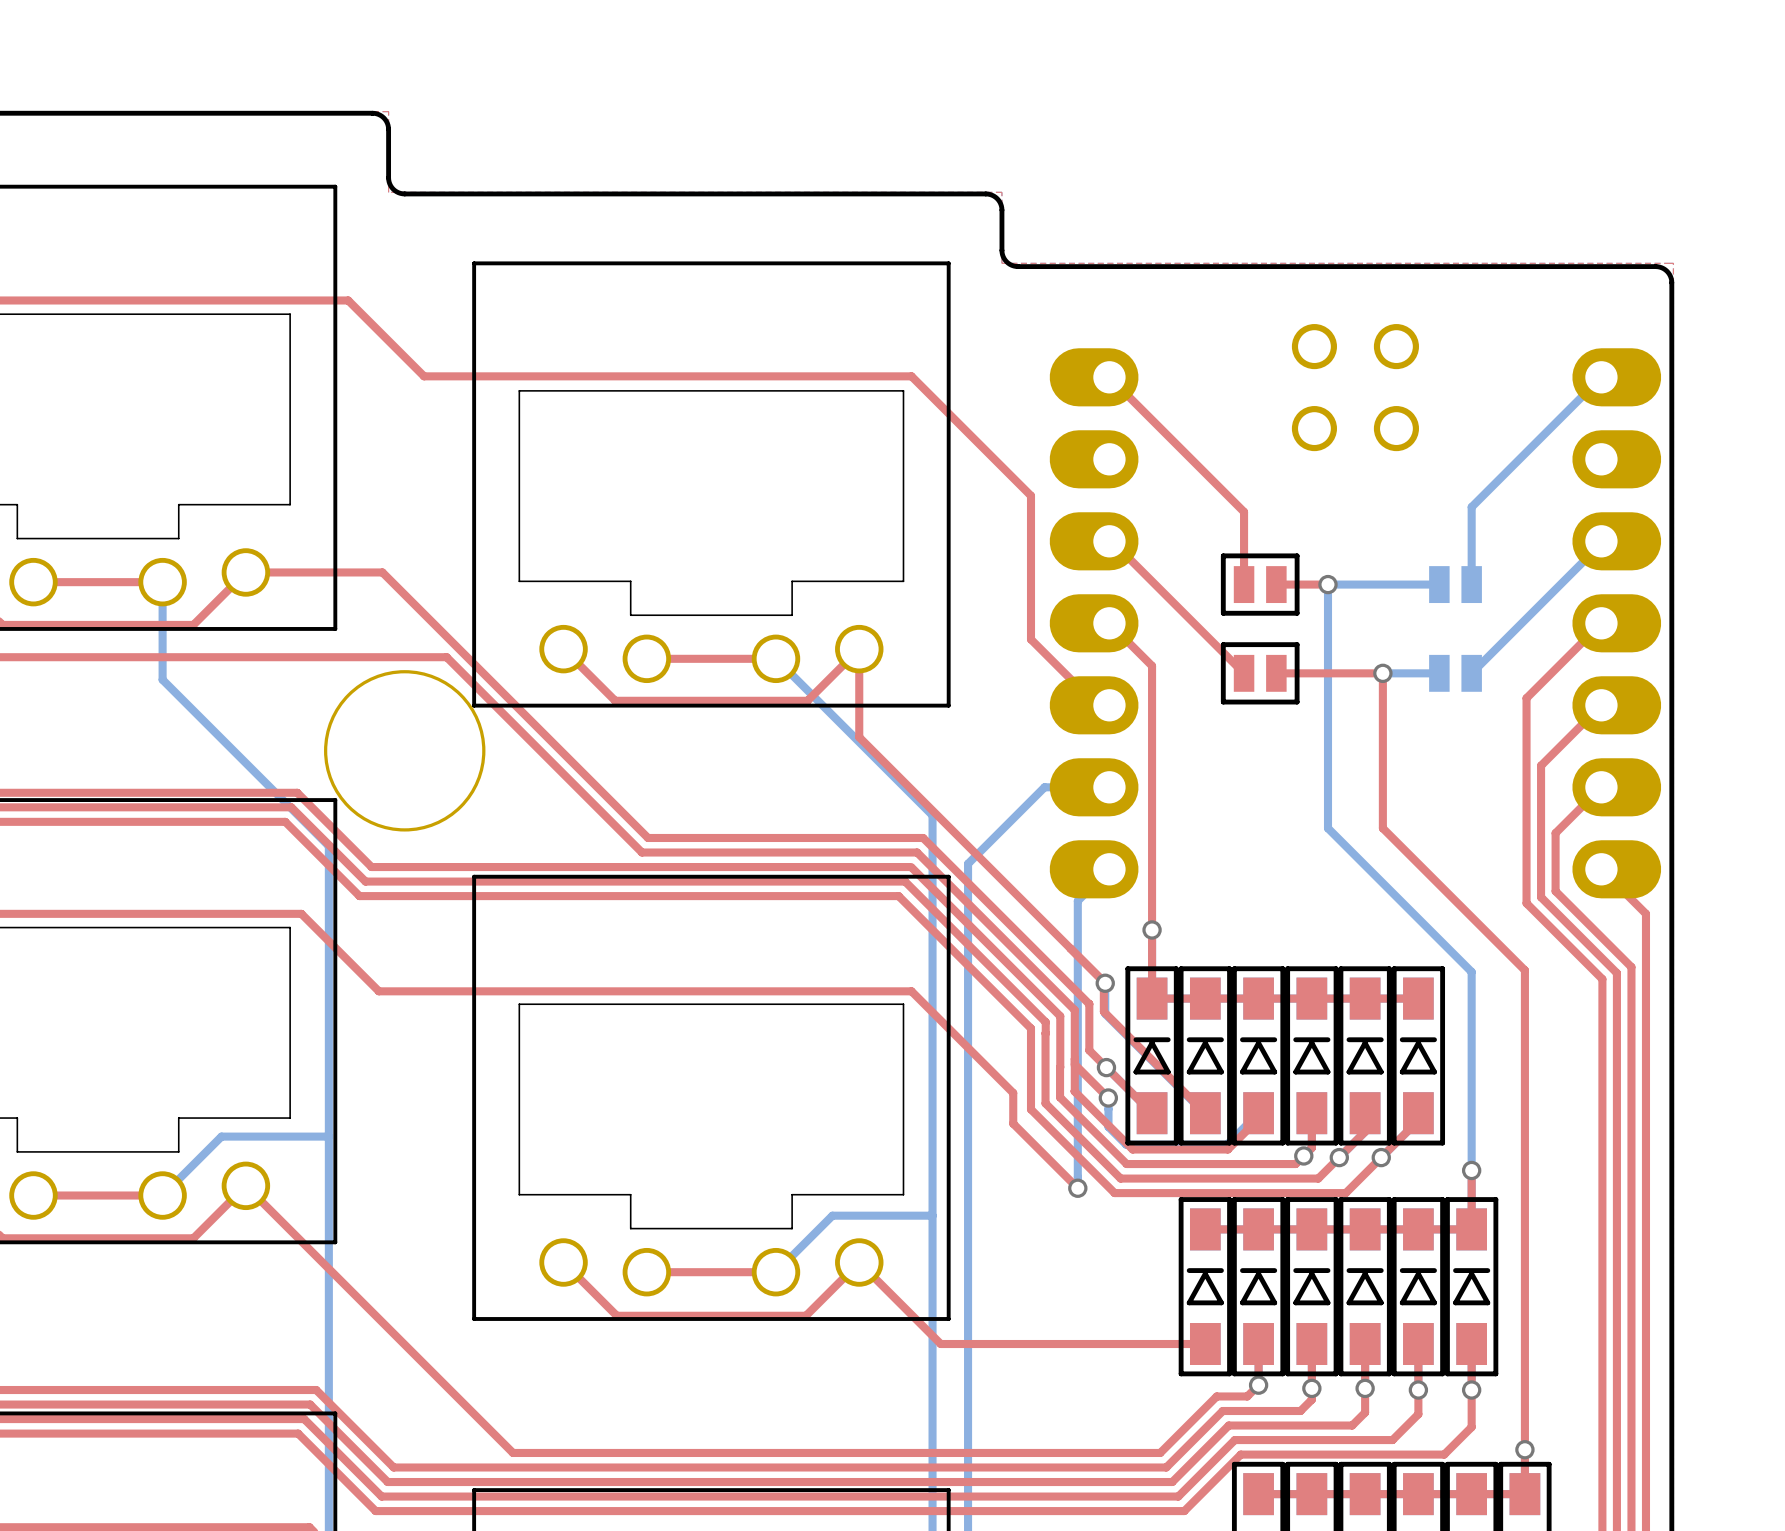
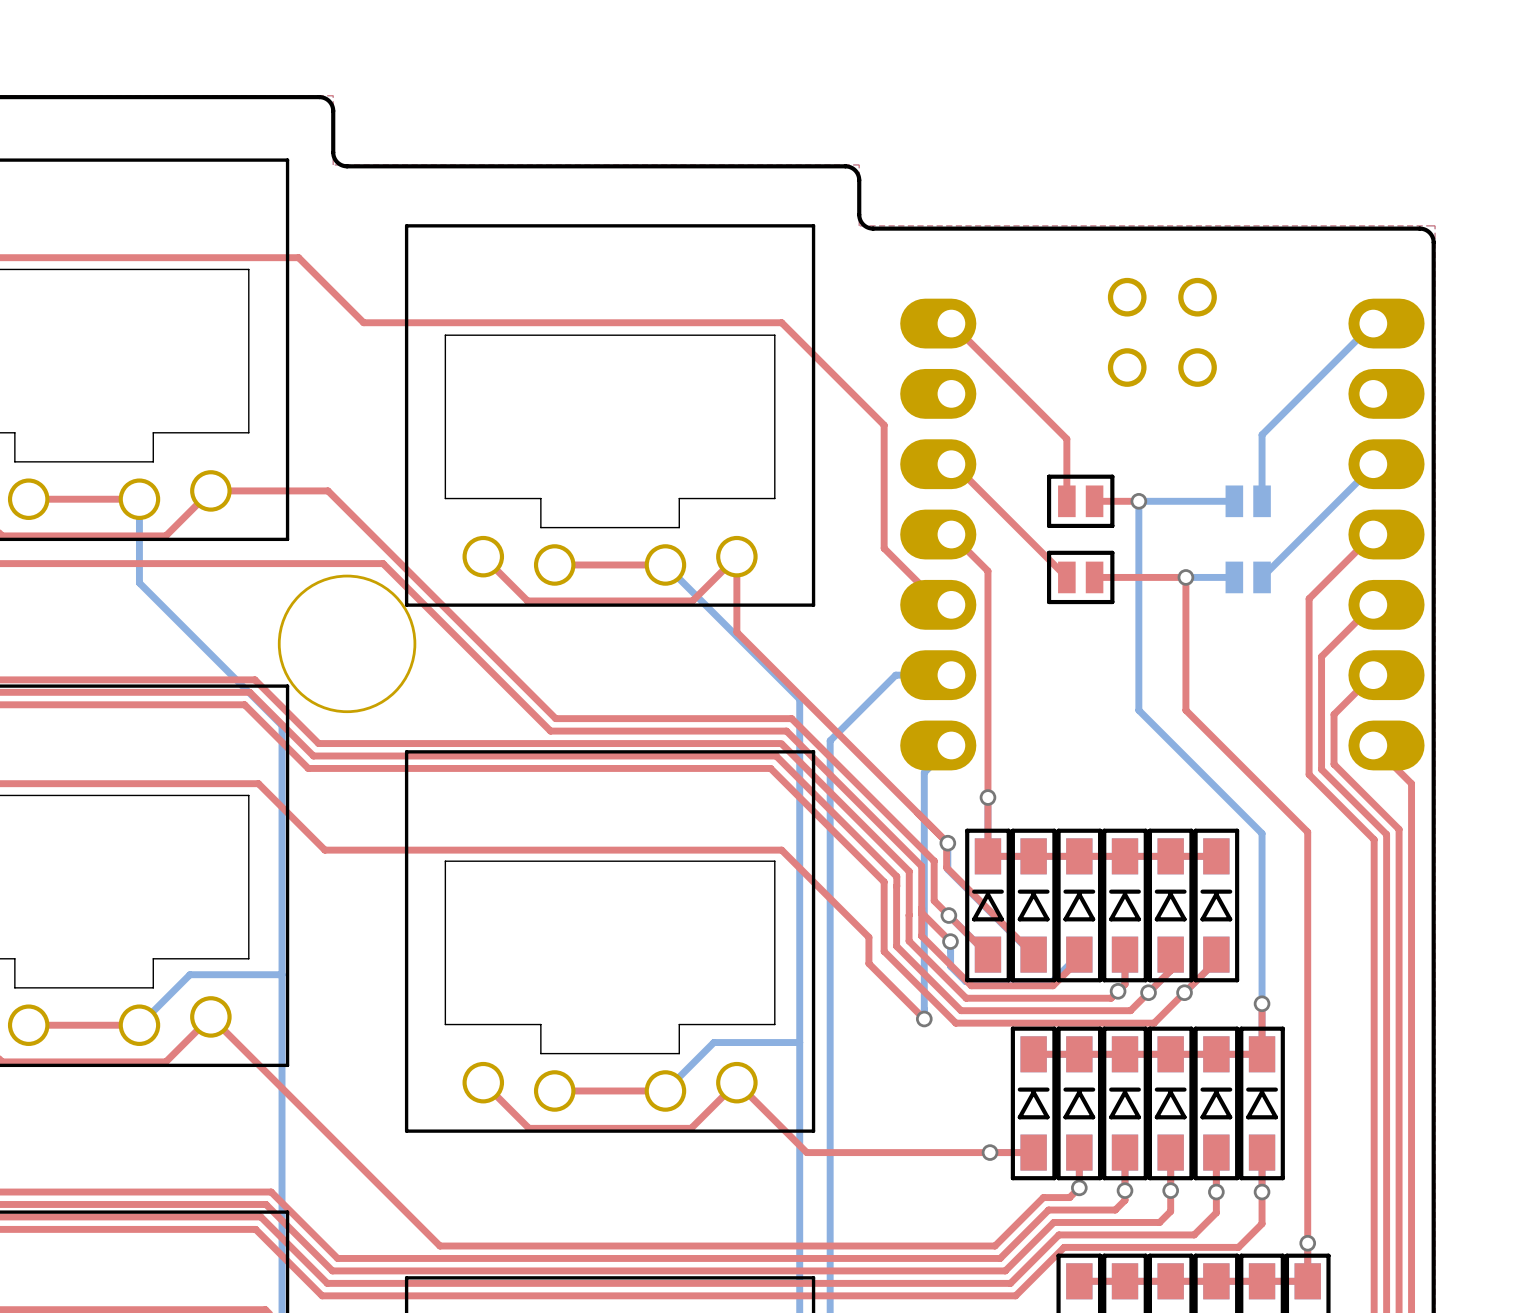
via: none -> (990, 1152)

